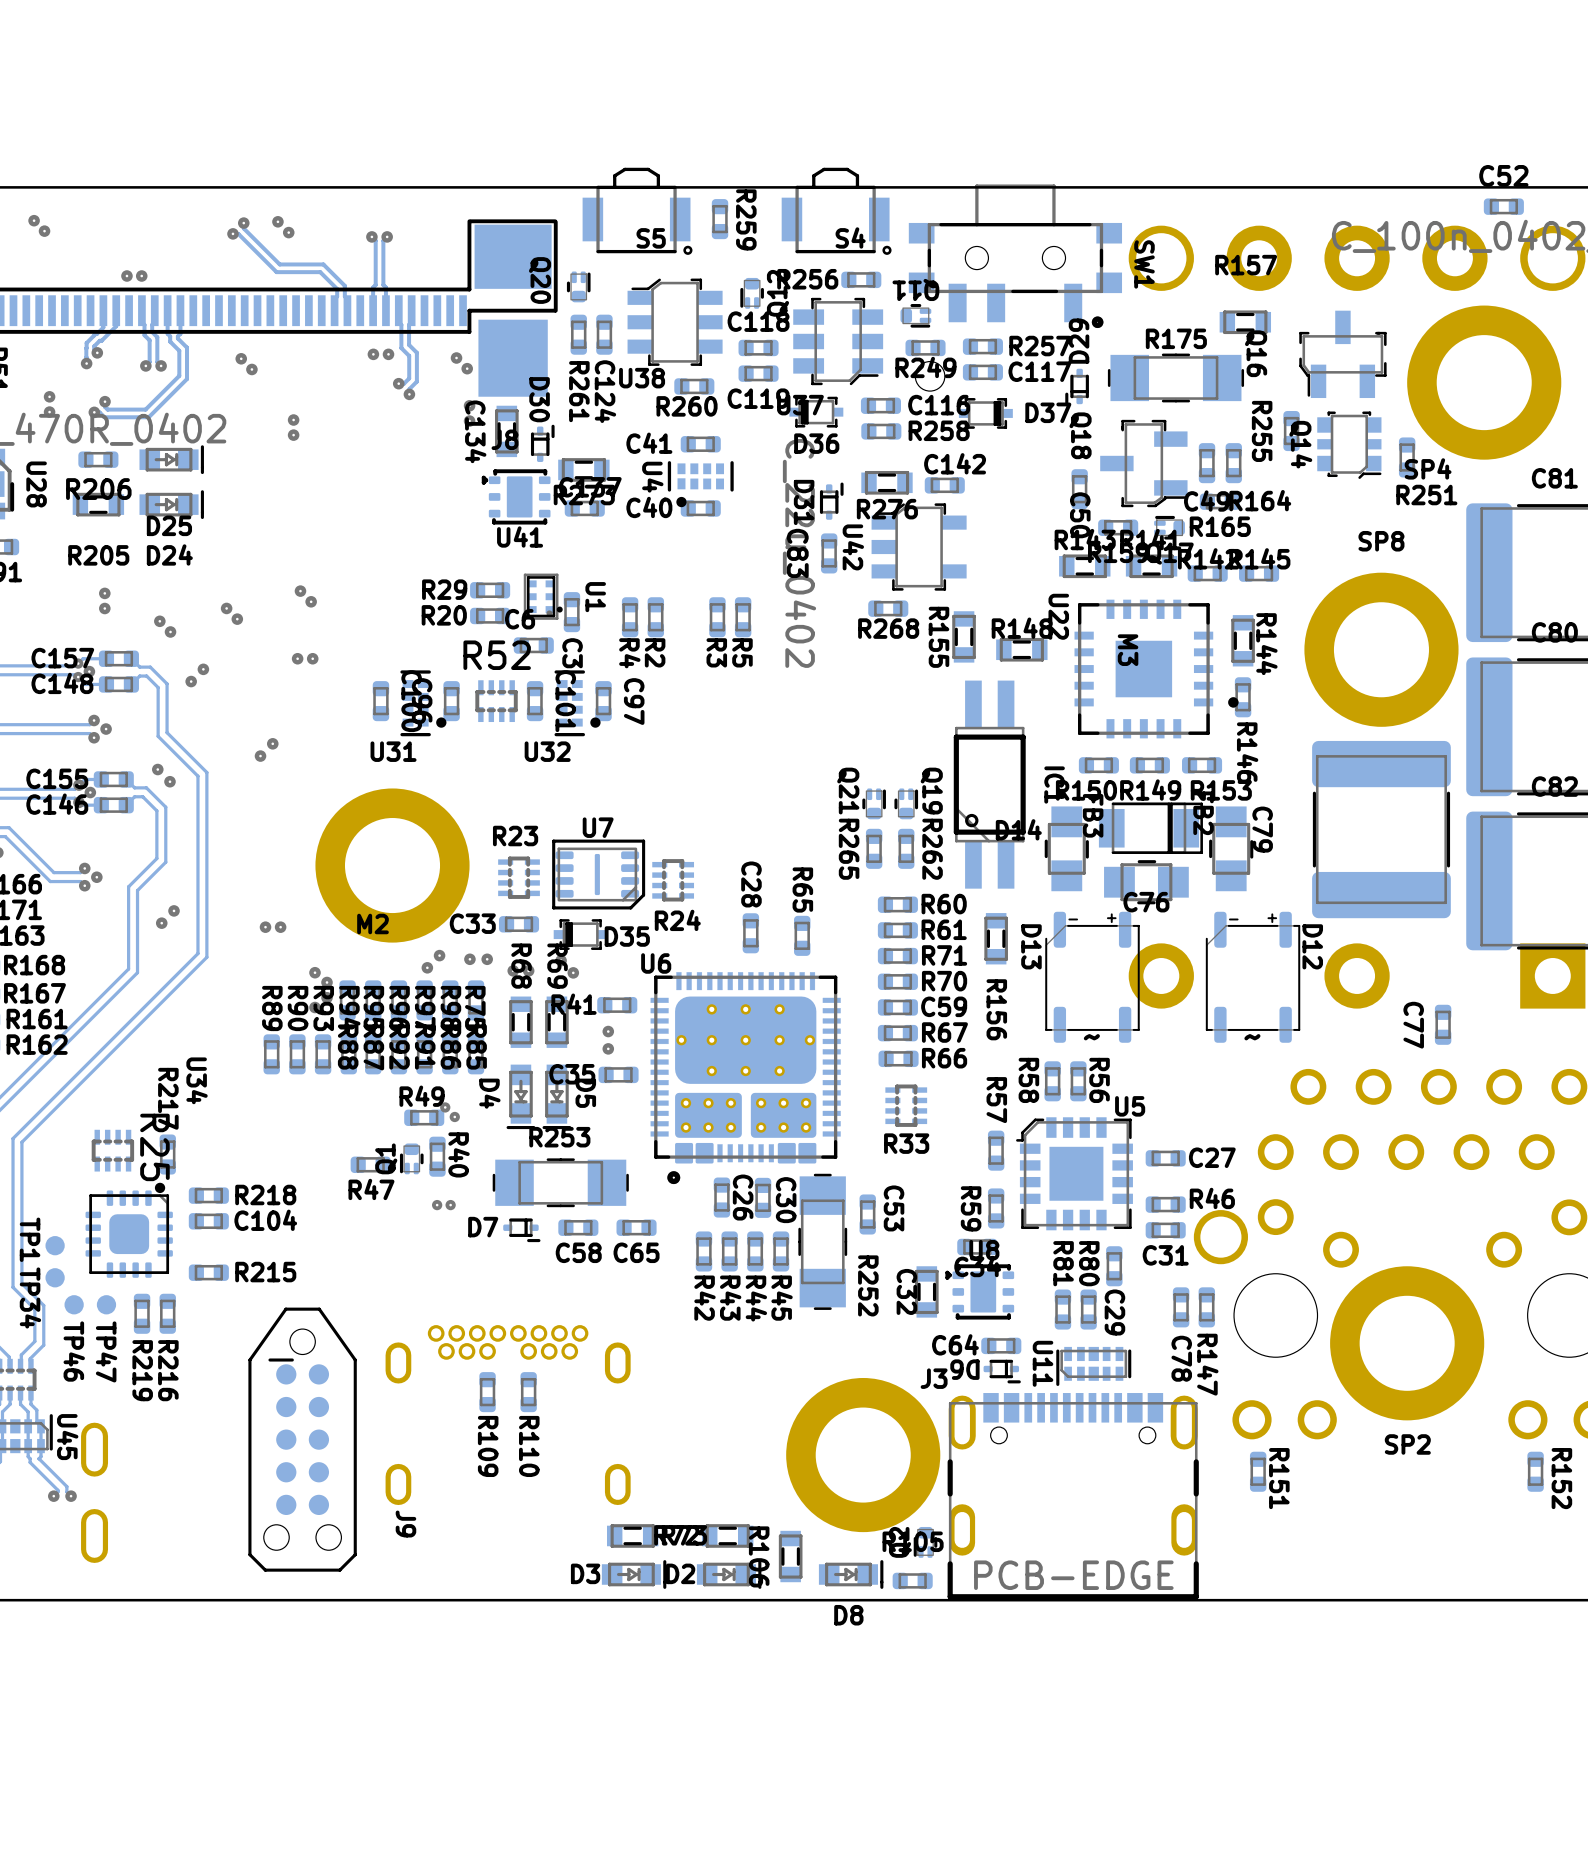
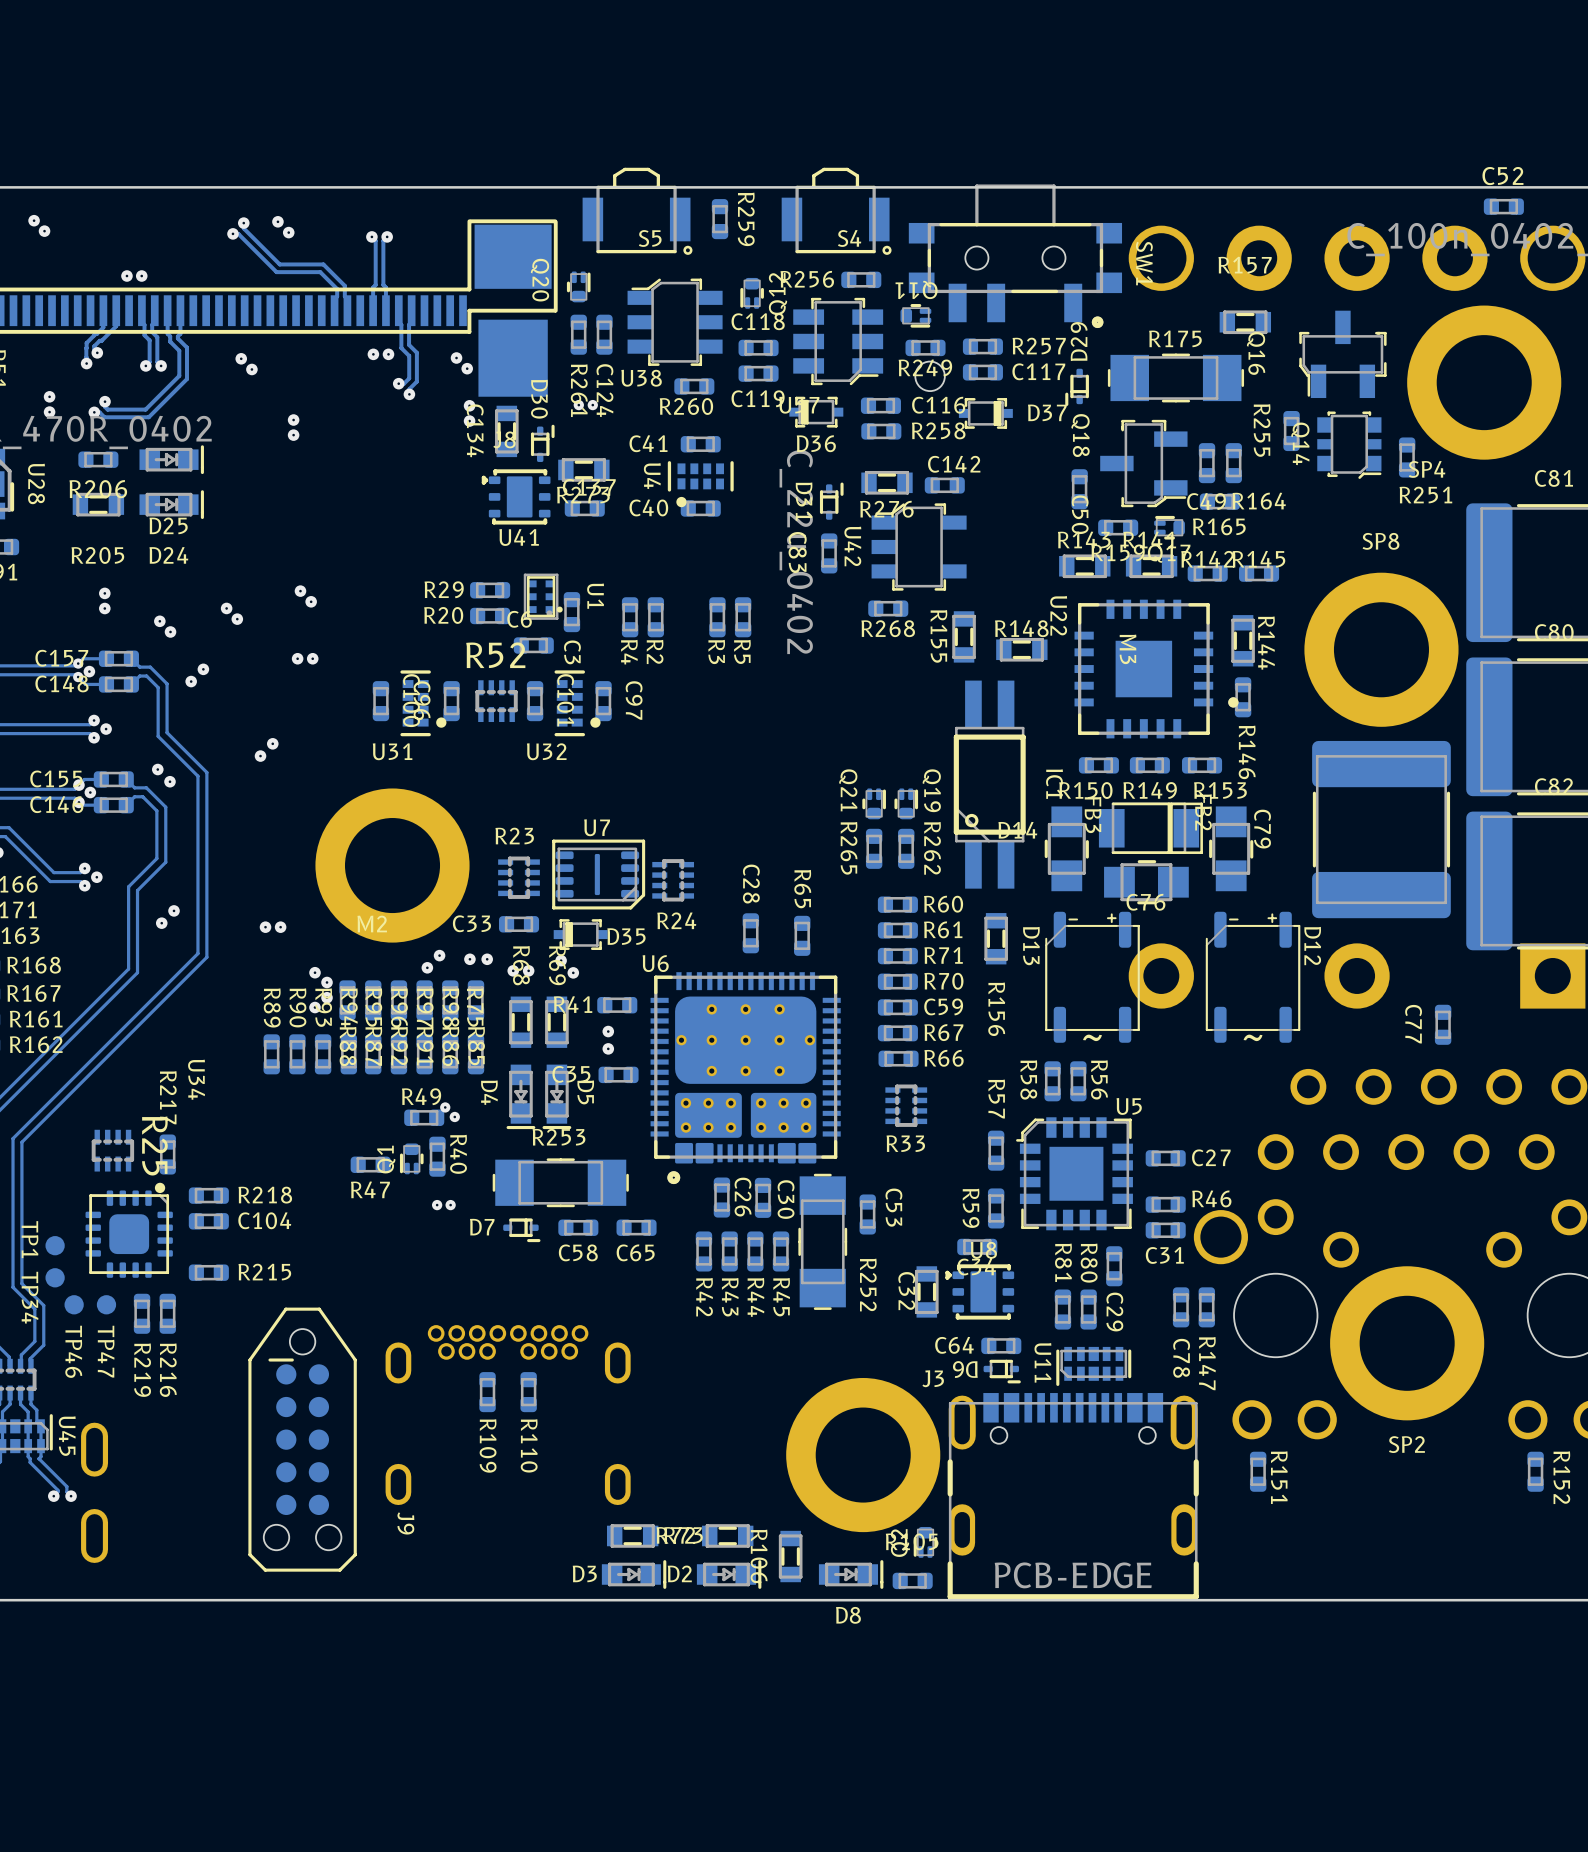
via: none -> (578, 405)
via: none -> (592, 405)

